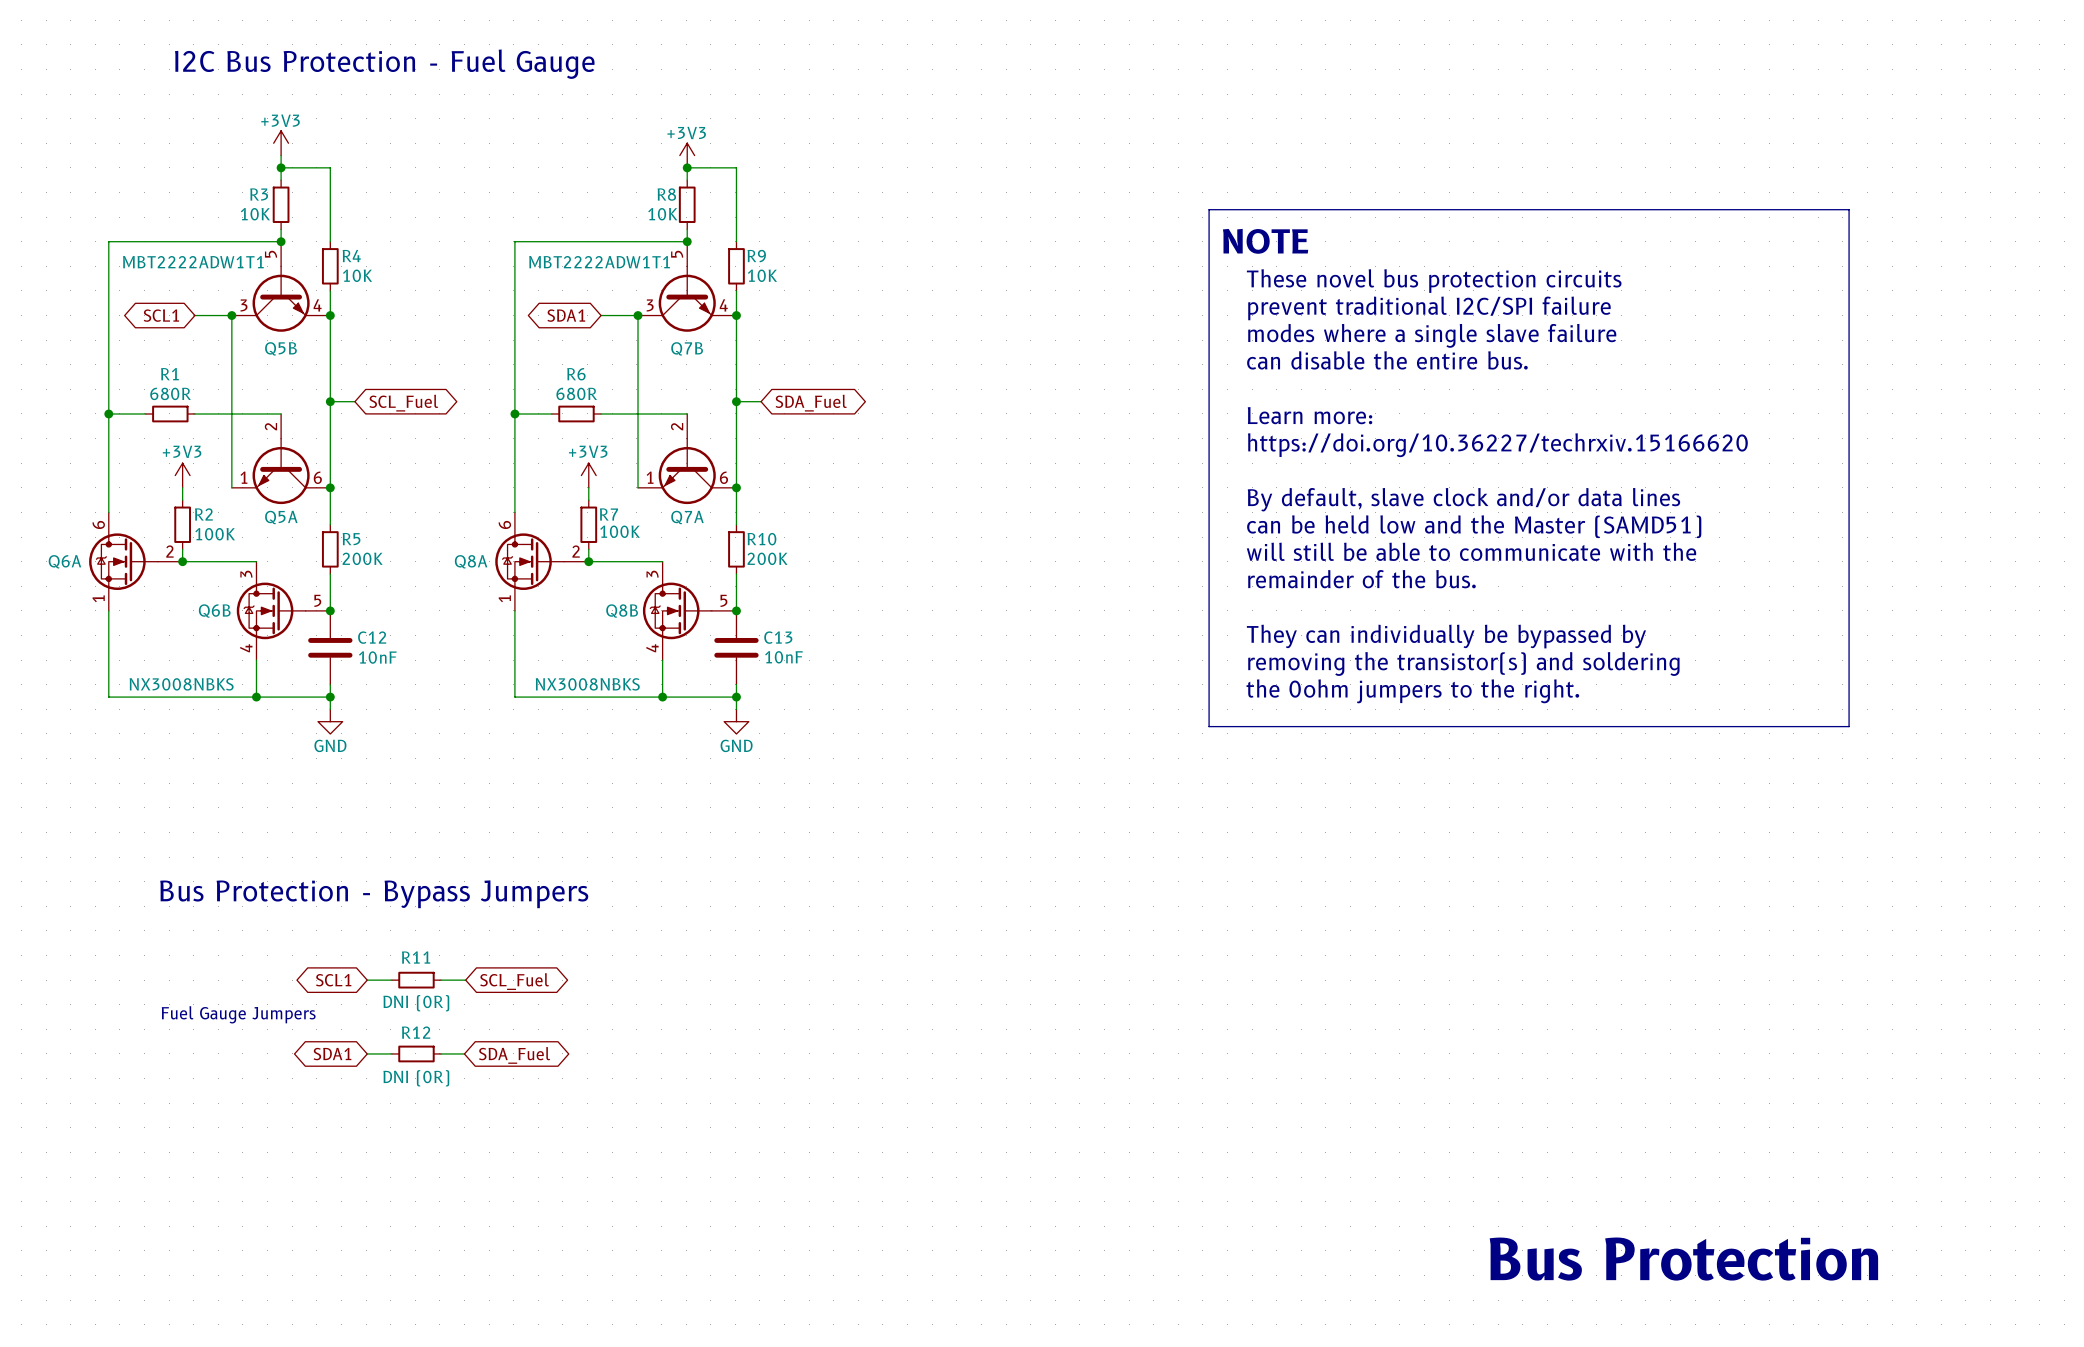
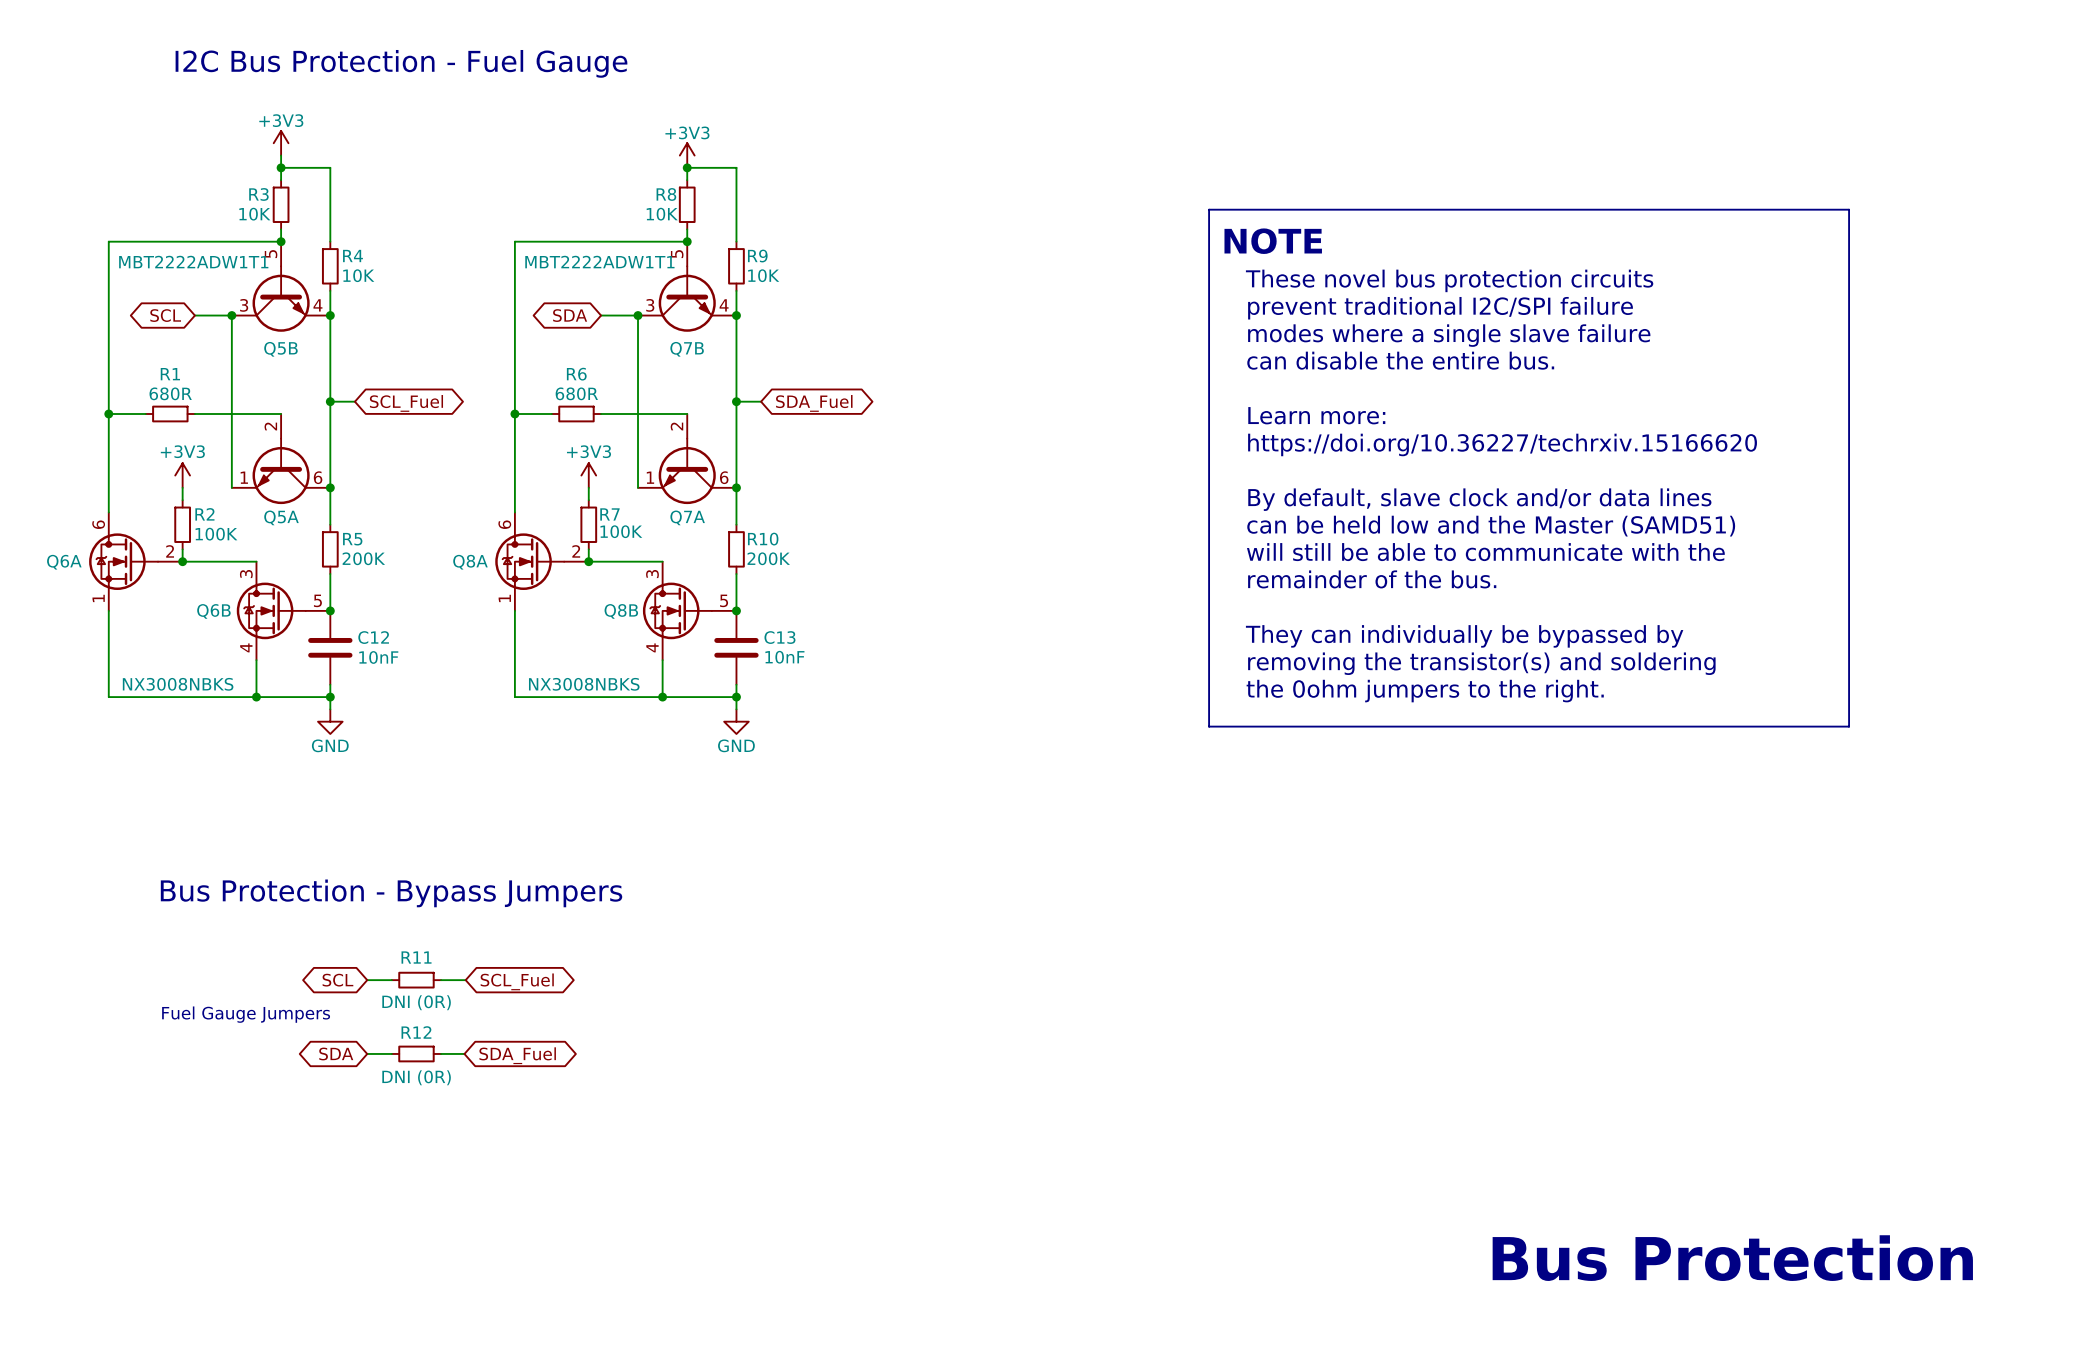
global label: SCL1 (161, 315) -> SCL (165, 315)
global label: SDA1 (566, 315) -> SDA (570, 315)
global label: SCL1 (333, 980) -> SCL (337, 980)
global label: SDA1 (332, 1054) -> SDA (336, 1053)

